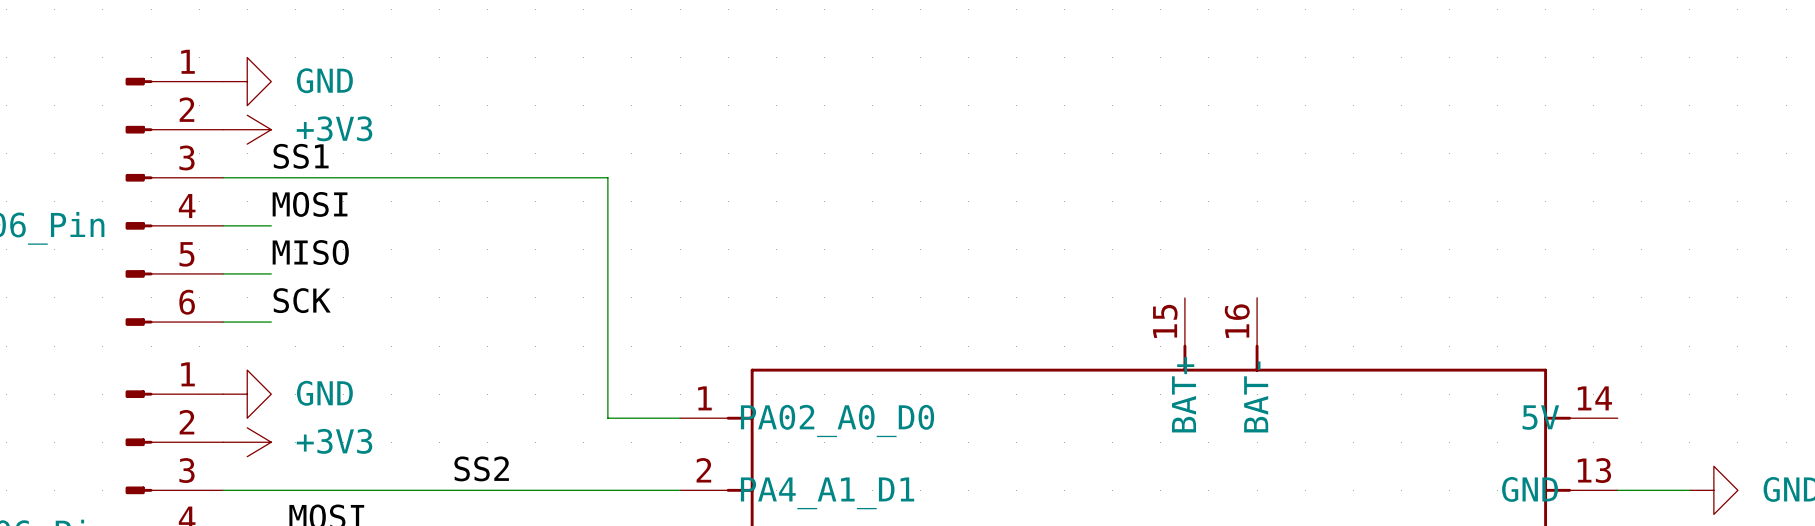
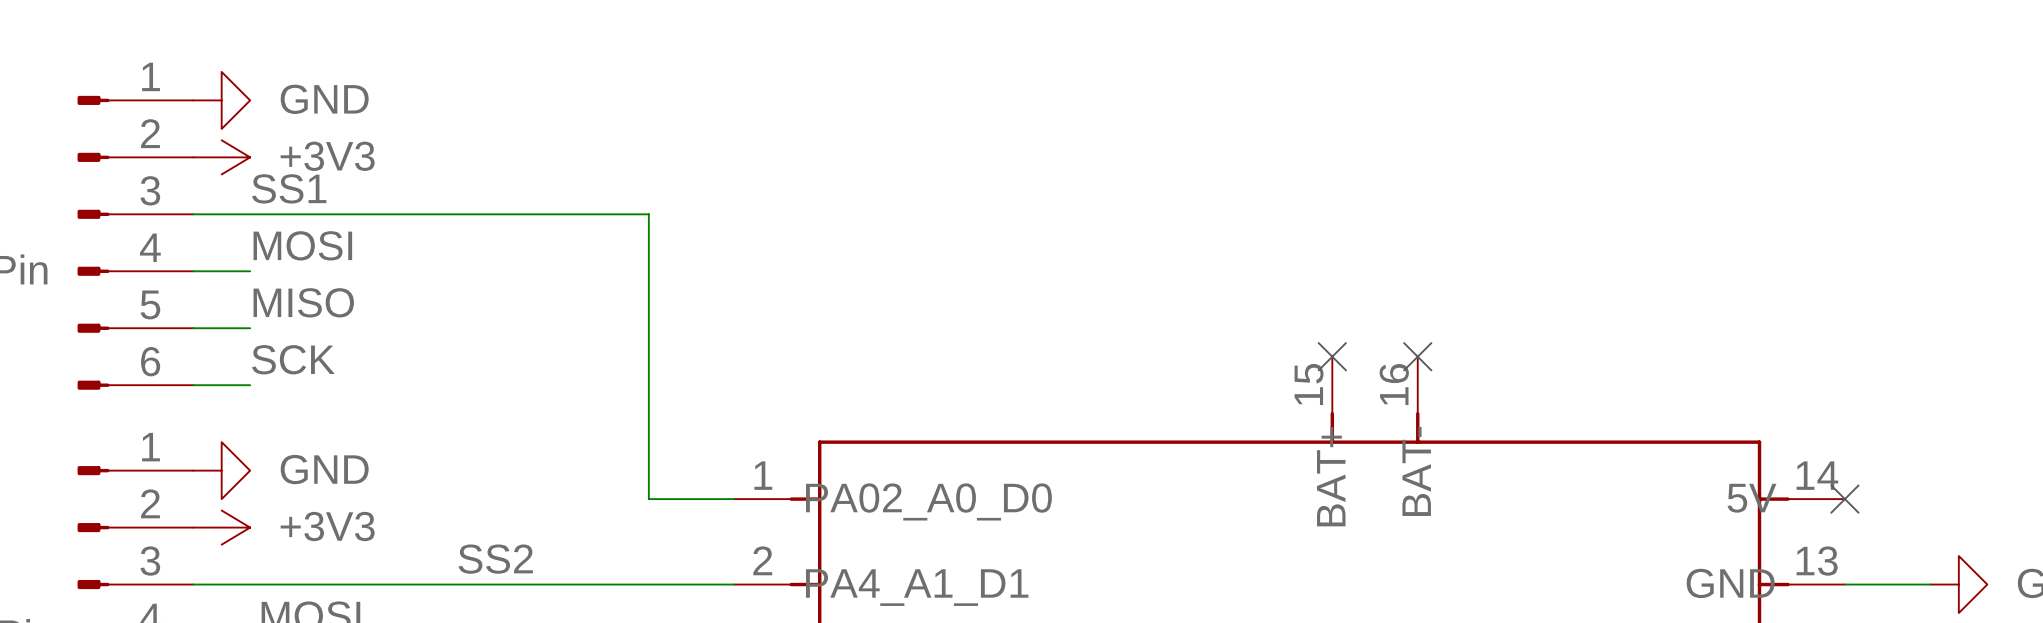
no-connect mark: none -> (1332, 356)
no-connect mark: none -> (1417, 356)
no-connect mark: none -> (1844, 499)

